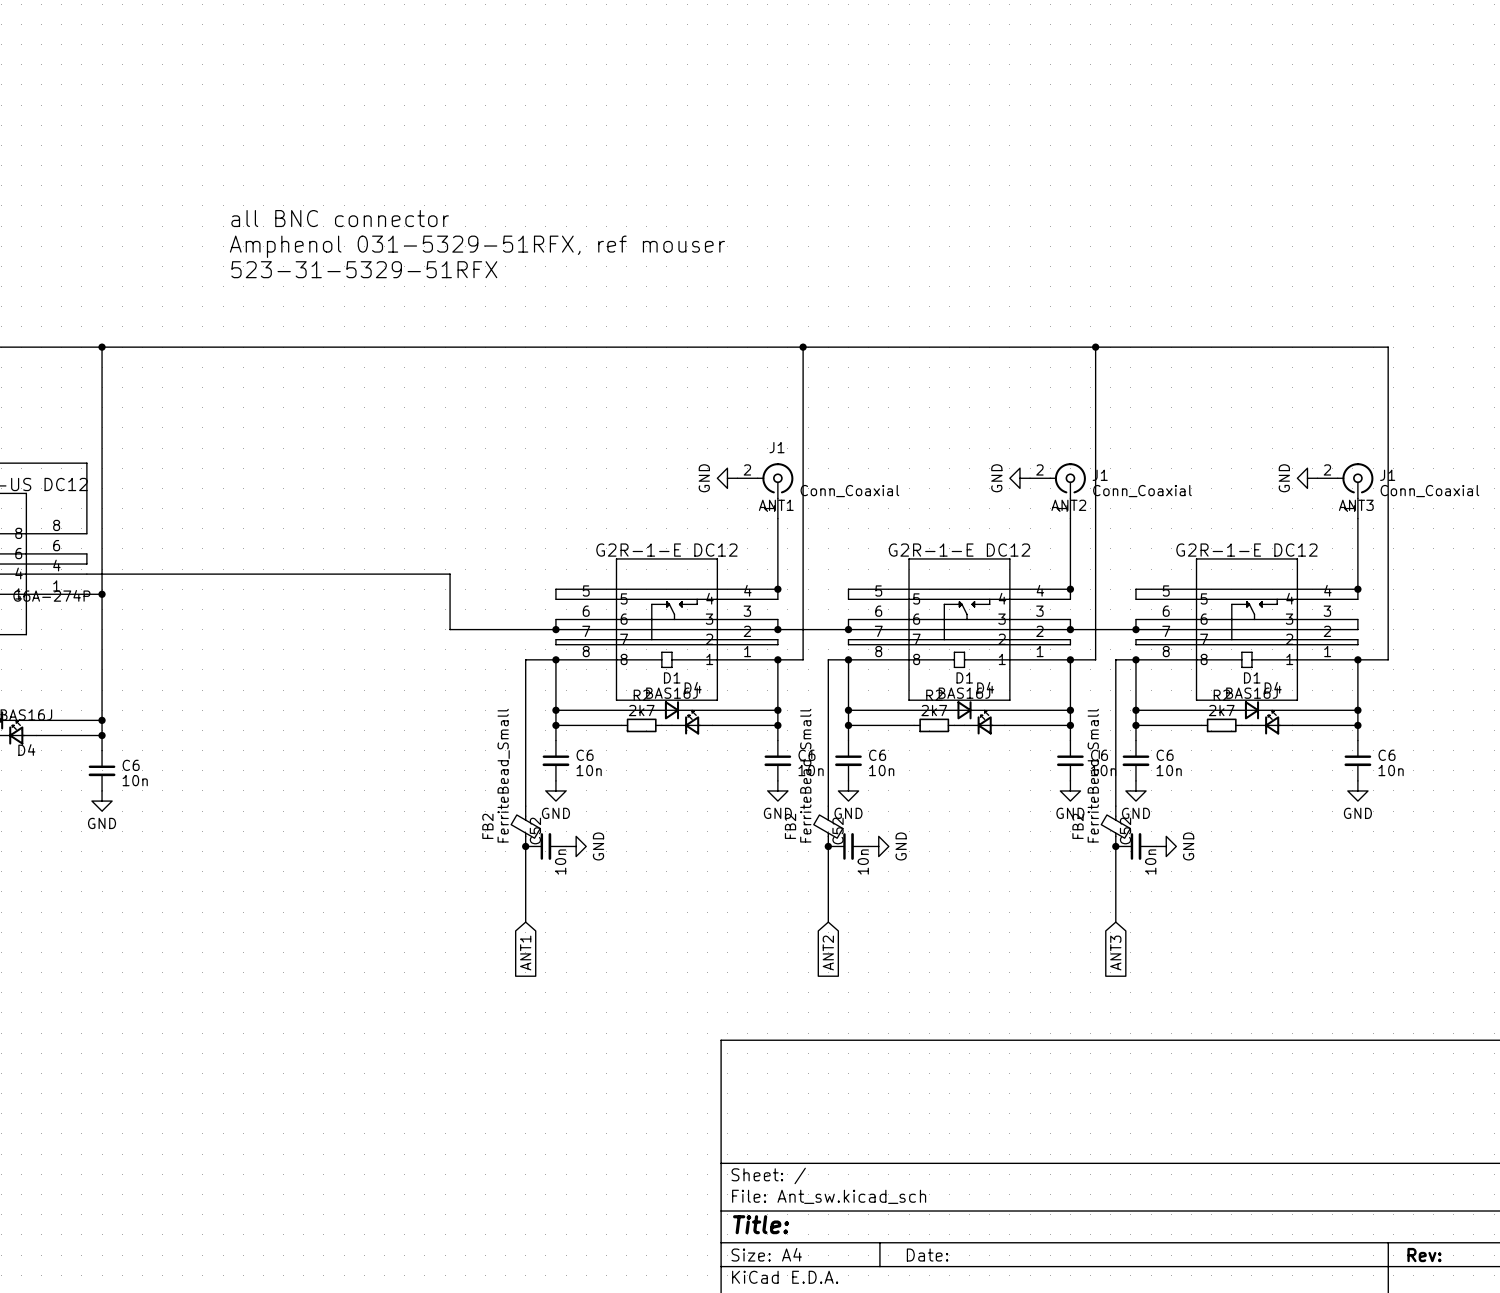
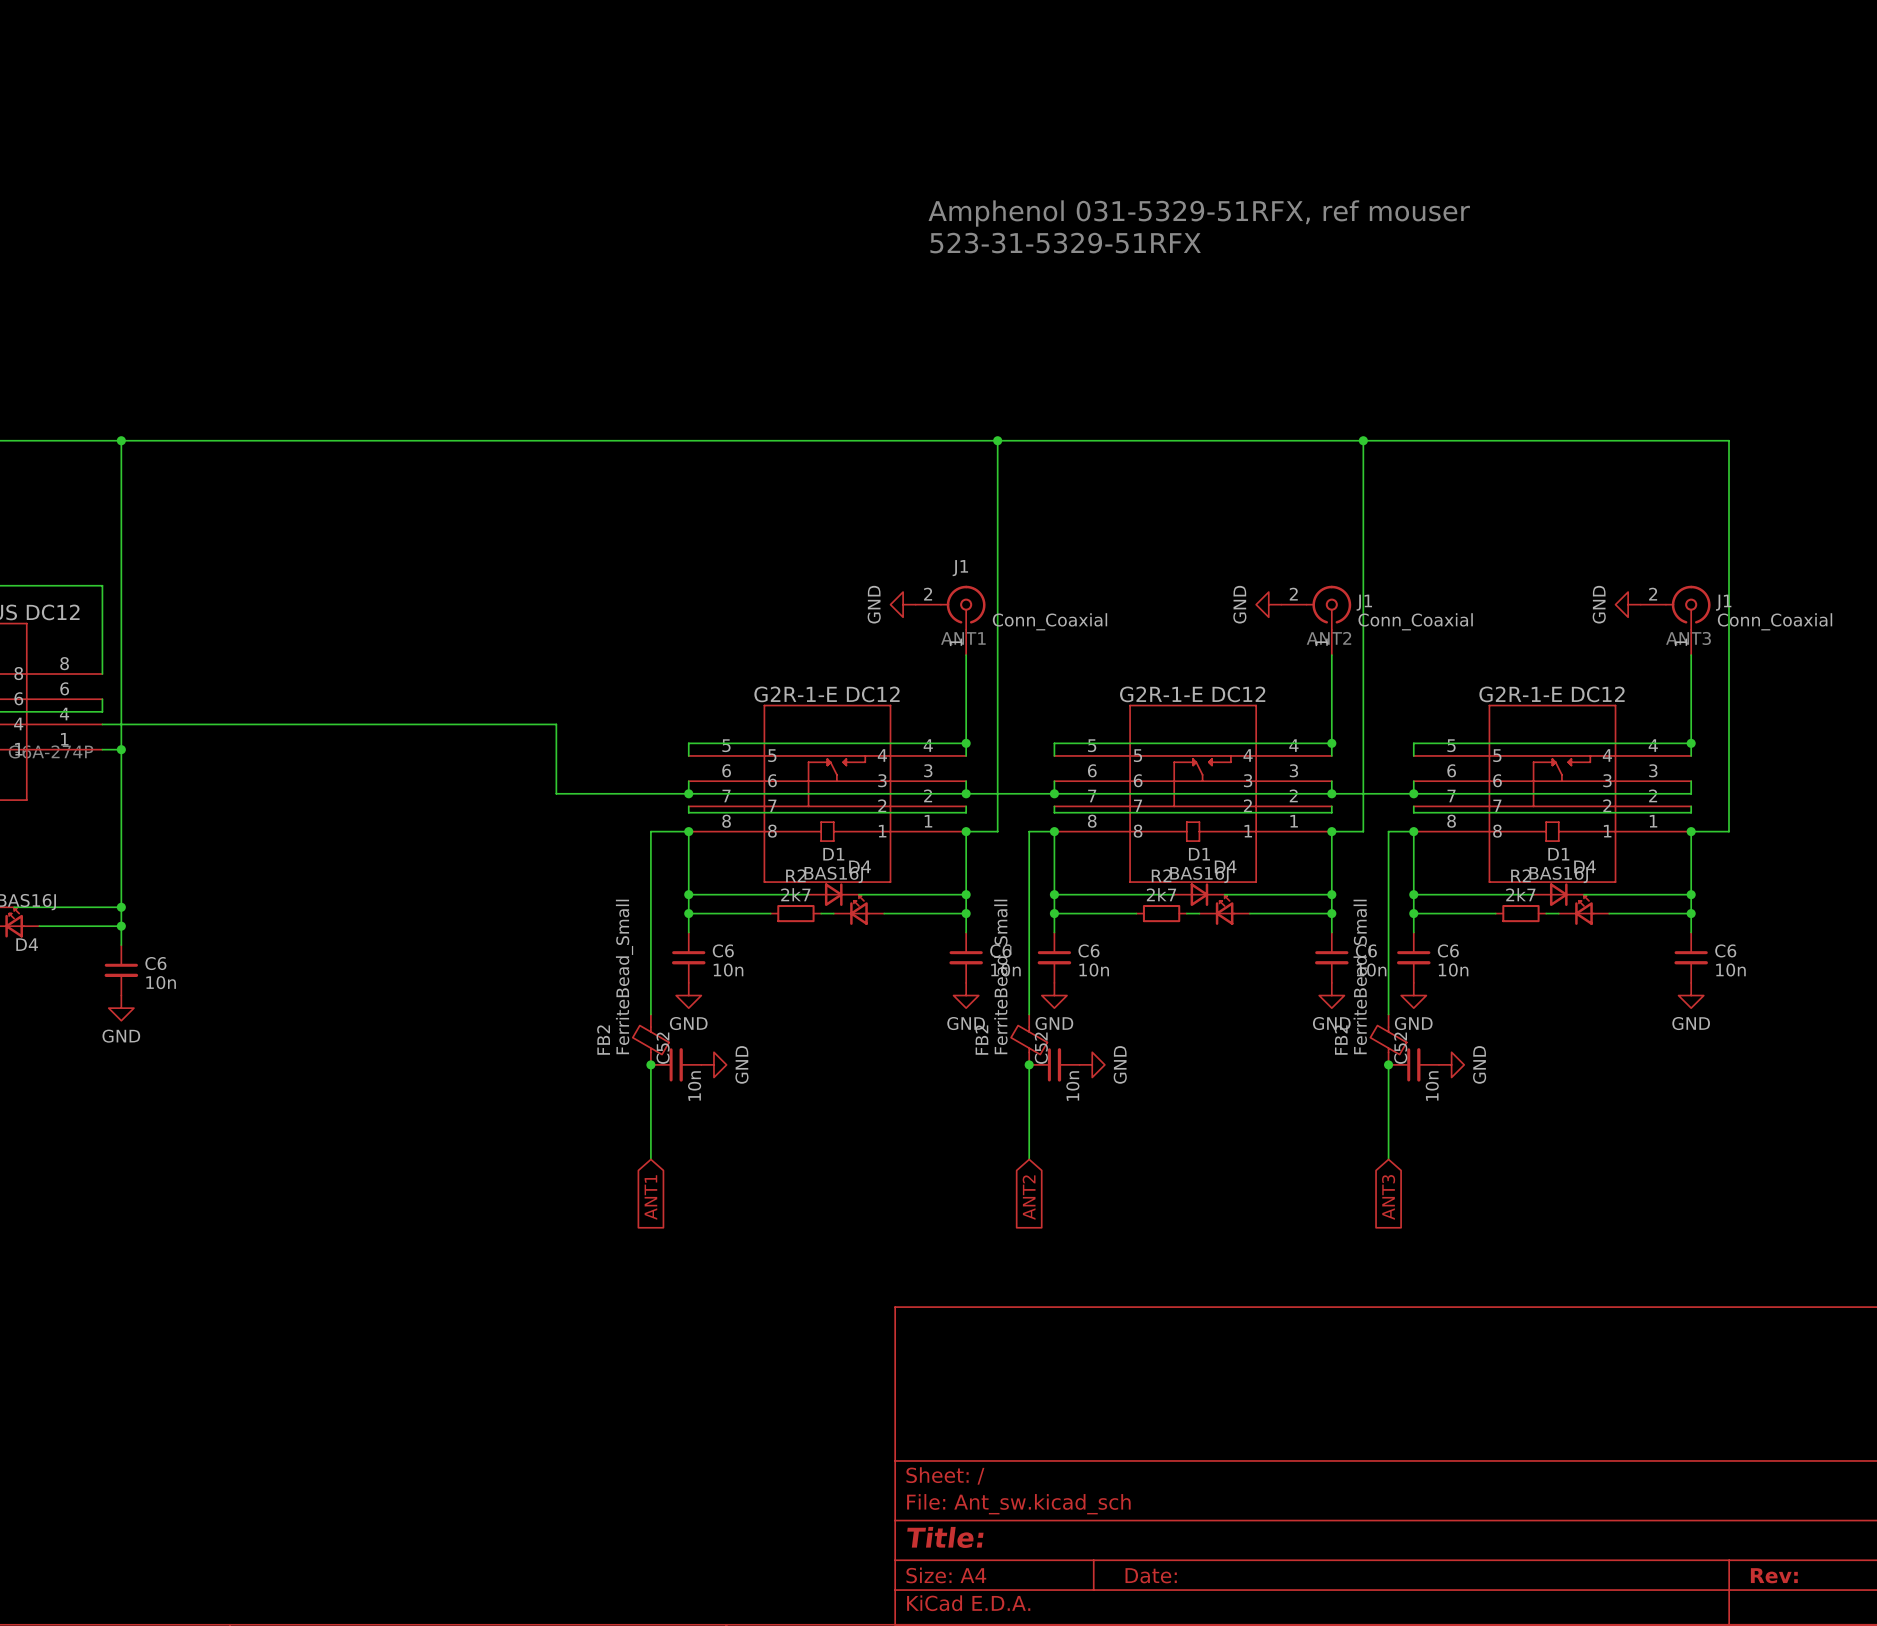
text: none -> Amphenol 031-5329-51RFX, ref mouser (1199, 213)
text: none -> 523-31-5329-51RFX (1065, 243)
text: all BNC connector (340, 218) -> none
text: Amphenol 031-5329-51RFX, ref mouser (477, 246) -> none
text: 523-31-5329-51RFX (364, 269) -> none

